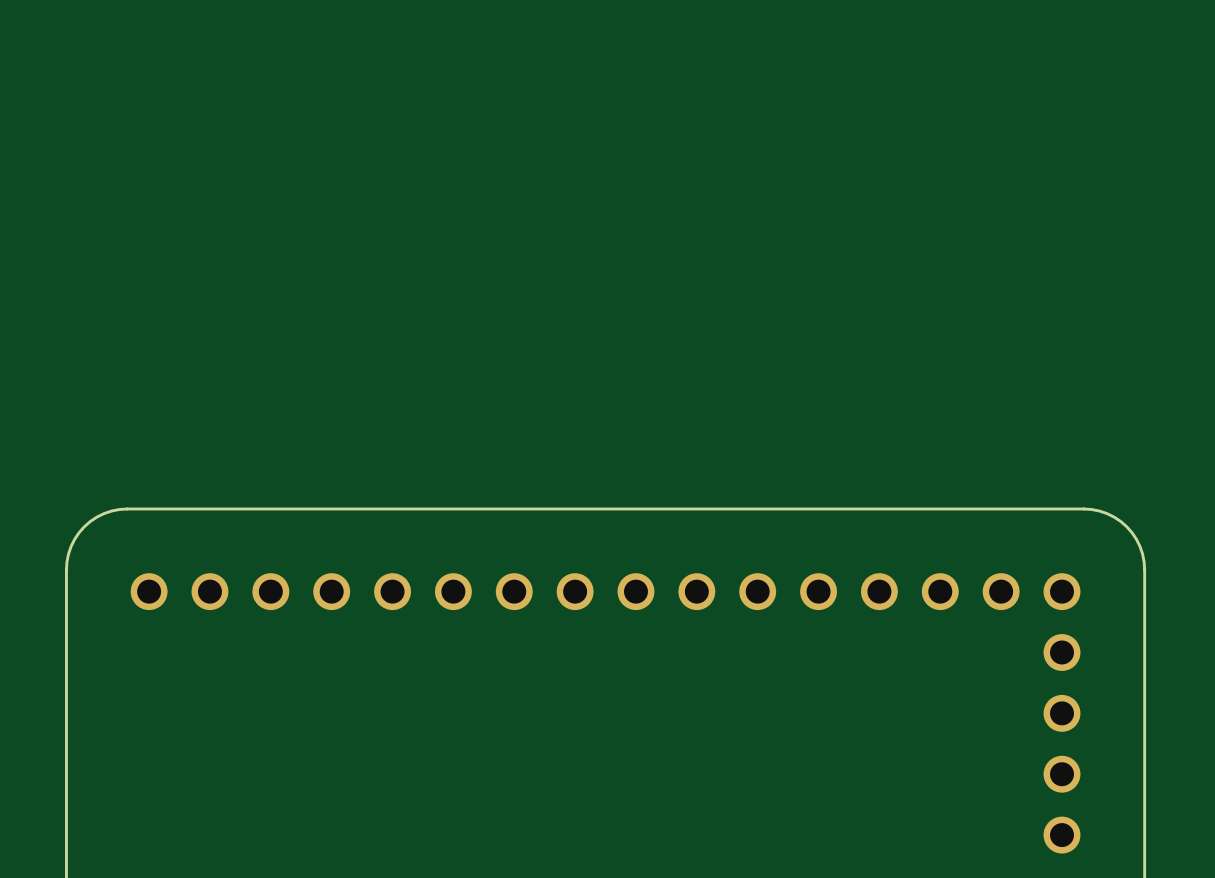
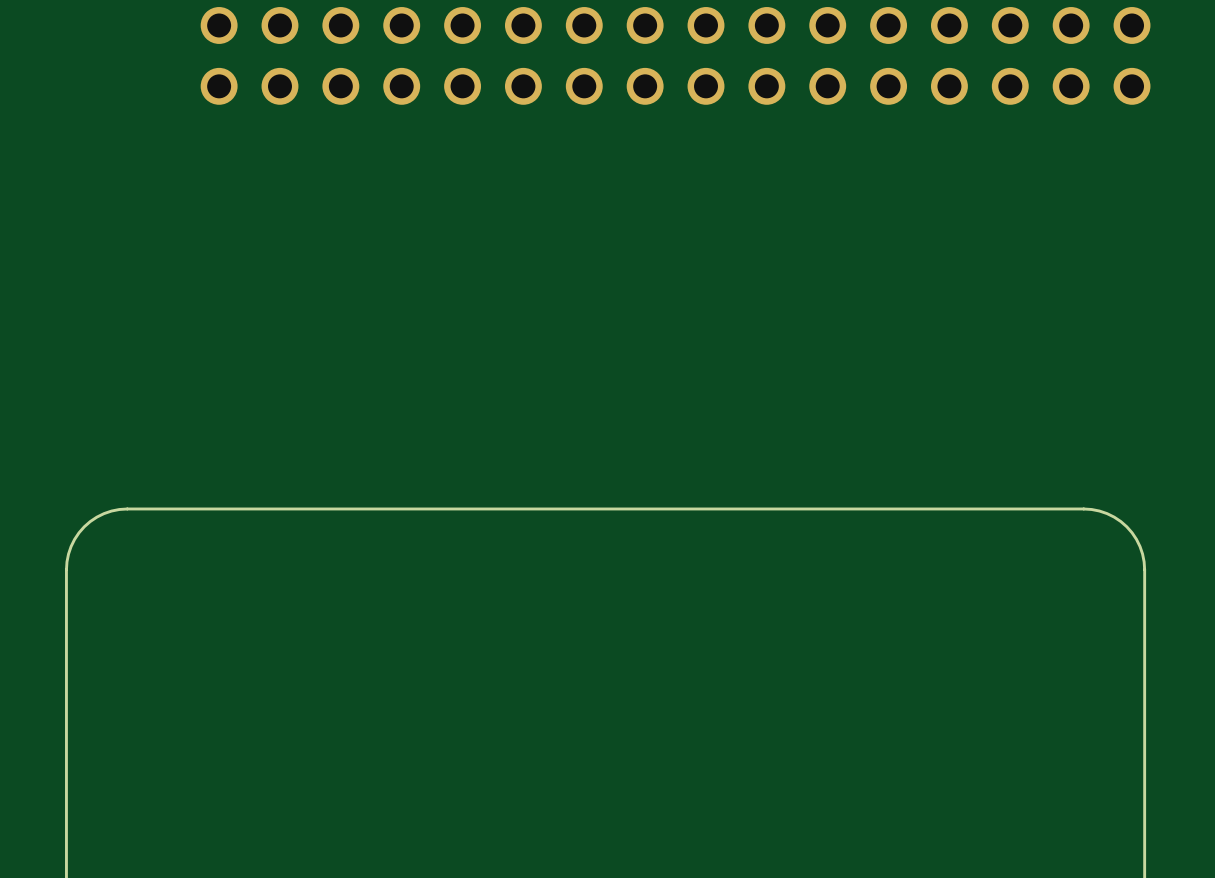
part: none -> (675, 25)
part: none -> (675, 86)
part: (605, 591) -> none
part: (1062, 743) -> none

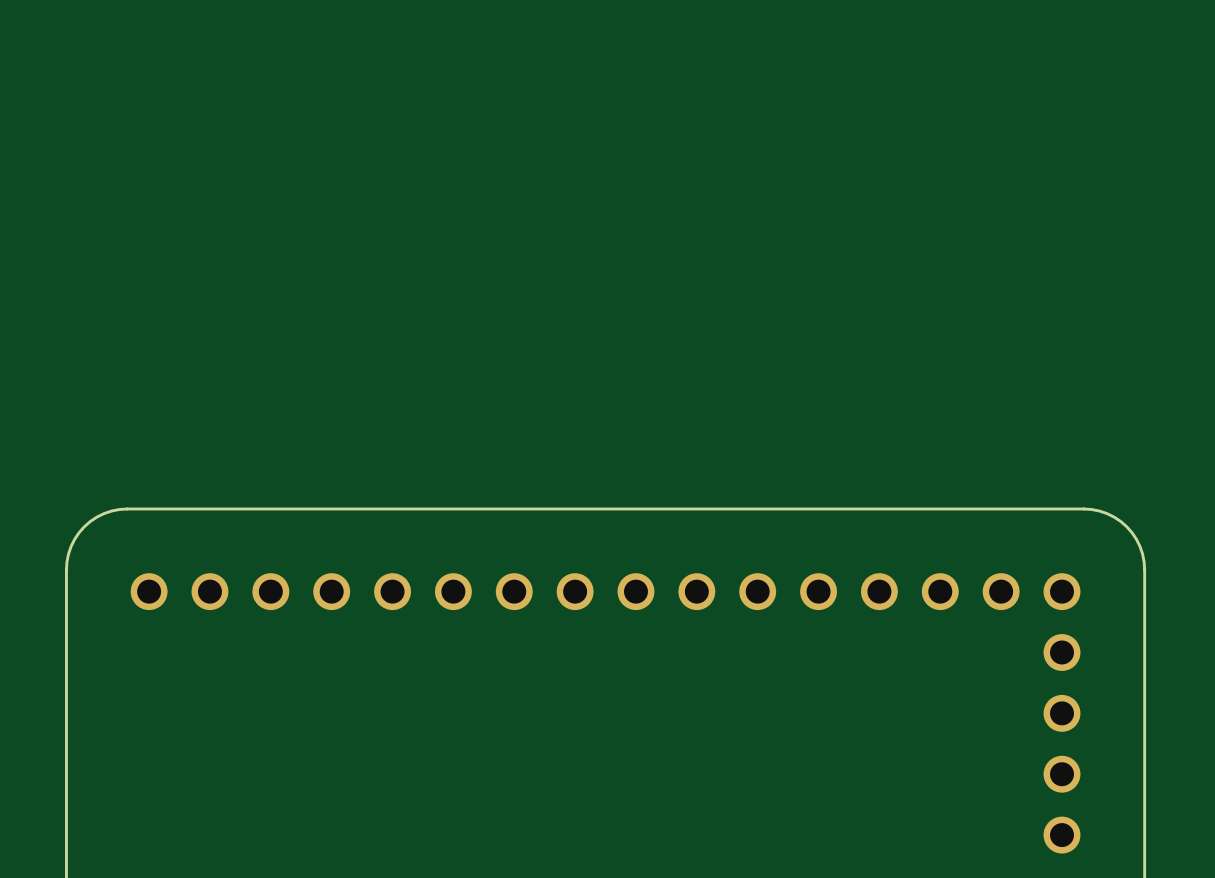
part: (675, 25) -> none
part: (675, 86) -> none
part: none -> (605, 591)
part: none -> (1062, 743)

